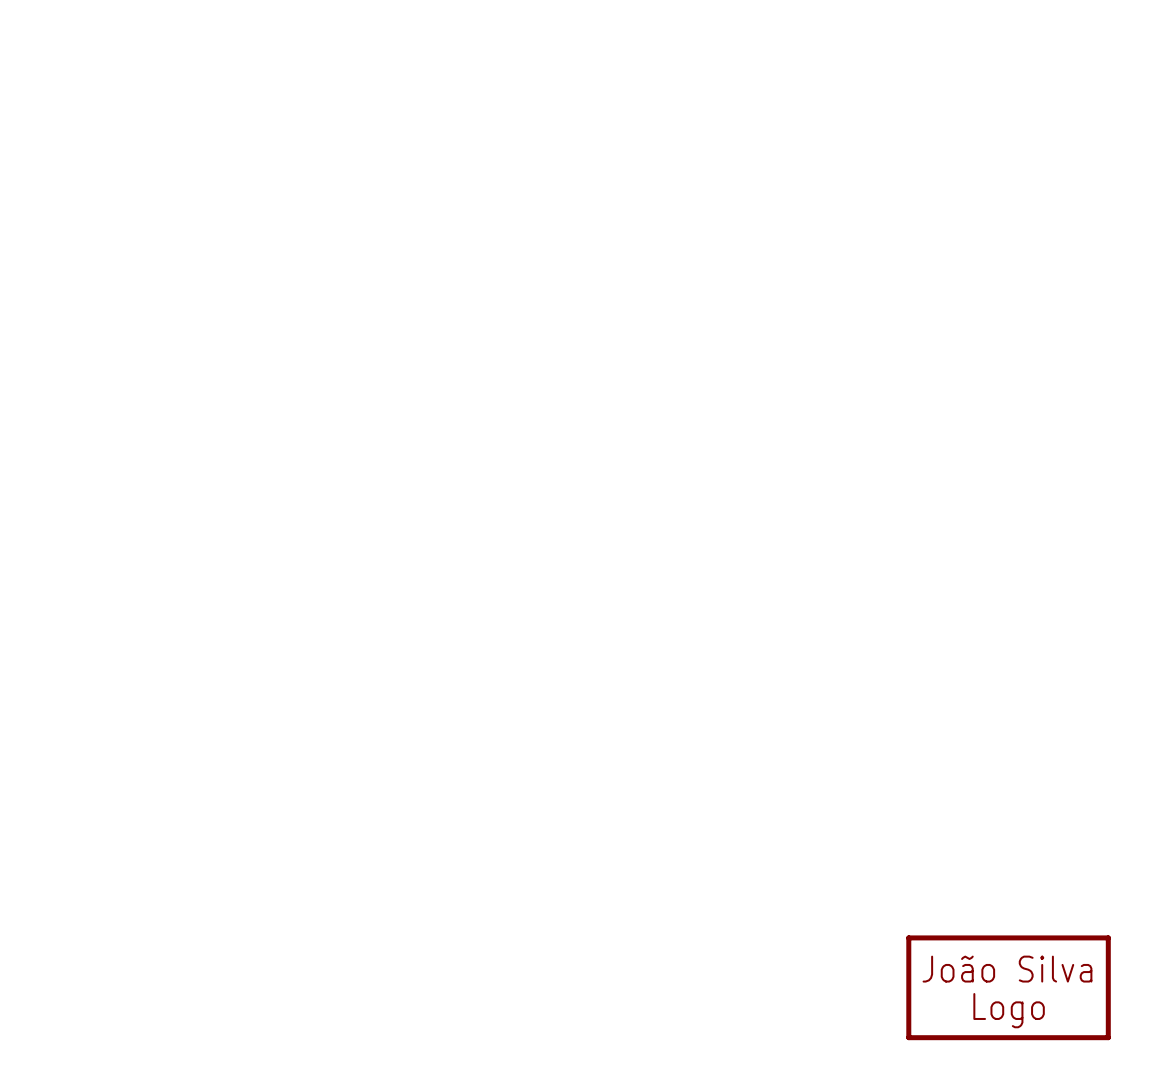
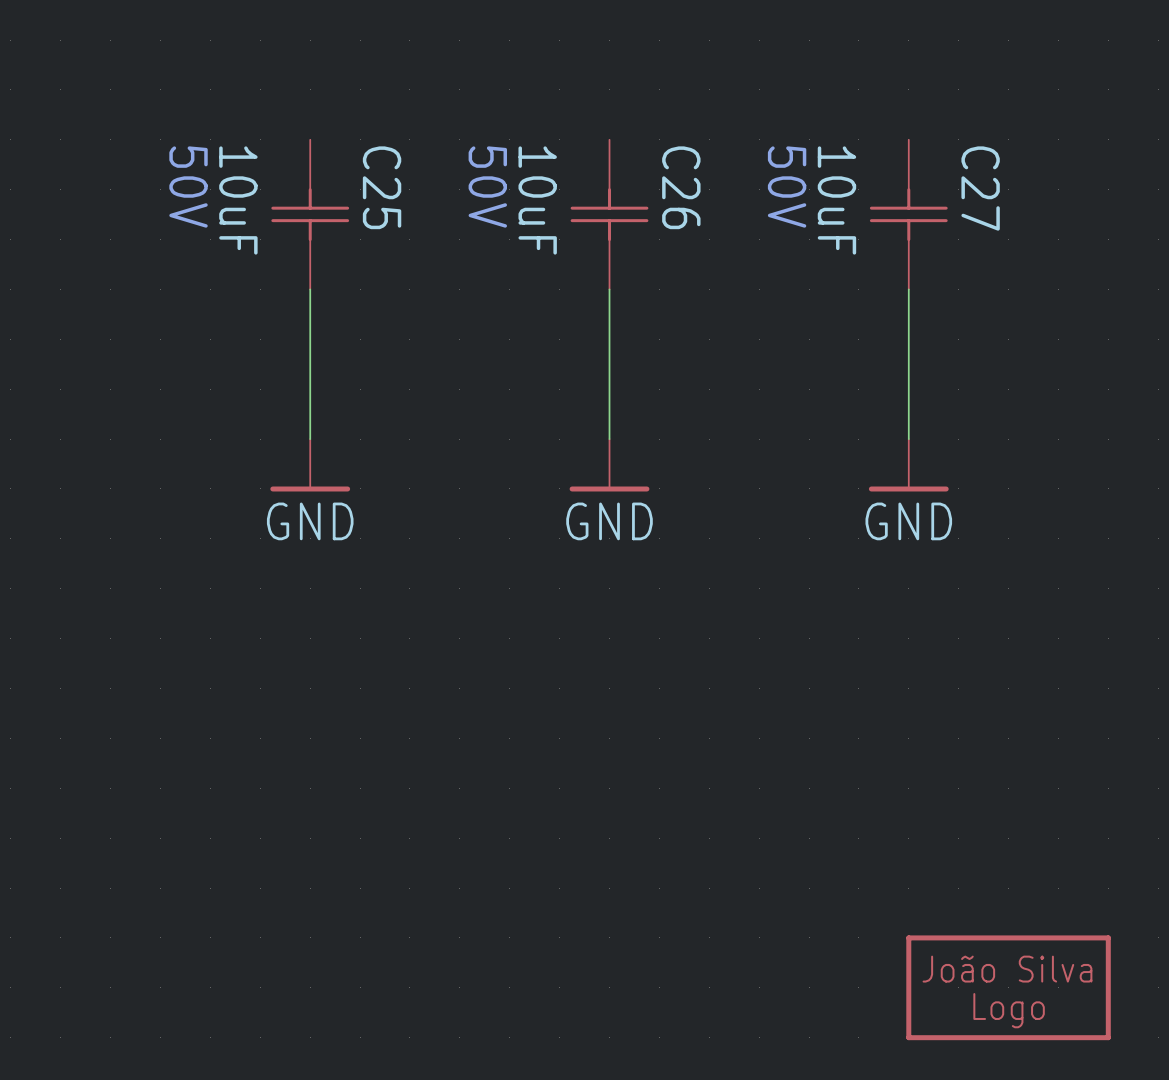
C25: none -> 10uF (310, 214)
C26: none -> 10uF (609, 214)
C27: none -> 10uF (908, 214)
wire: none -> (310, 289) (310, 439)
wire: none -> (609, 289) (609, 439)
wire: none -> (908, 289) (908, 439)
power symbol: none -> GND (310, 465)
power symbol: none -> GND (609, 465)
power symbol: none -> GND (908, 465)

